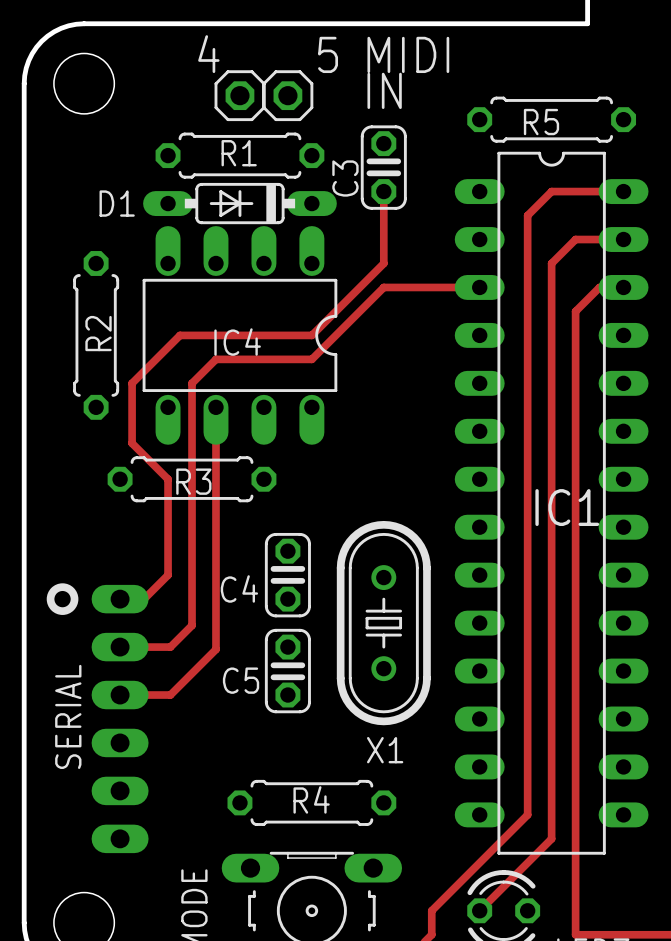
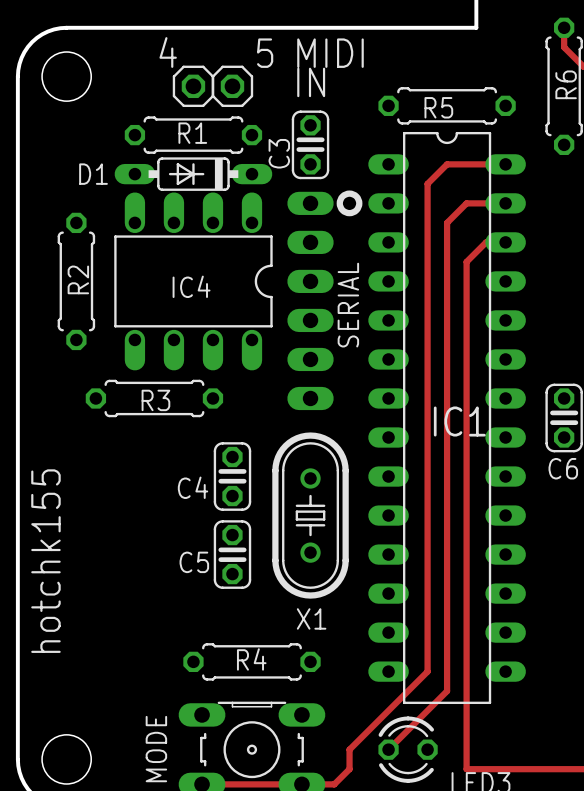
track: (383, 191) (383, 263) (311, 335) (180, 335) (132, 383) (132, 443) (168, 479) (168, 575) (144, 599) (120, 599) -> none
drawing: none -> [336, 190, 363, 217]
track: (479, 287) (383, 287) (311, 359) (215, 359) (192, 383) (192, 625) (170, 647) (120, 647) -> none
track: (215, 407) (215, 649) (170, 695) (120, 695) -> none
drawing: [46, 583, 79, 615] -> none
text: none -> hotchk155 (45, 561)
SERIAL name position: SERIAL (68, 716) -> SERIAL (348, 305)
SERIAL position: (120, 719) -> (310, 300)

